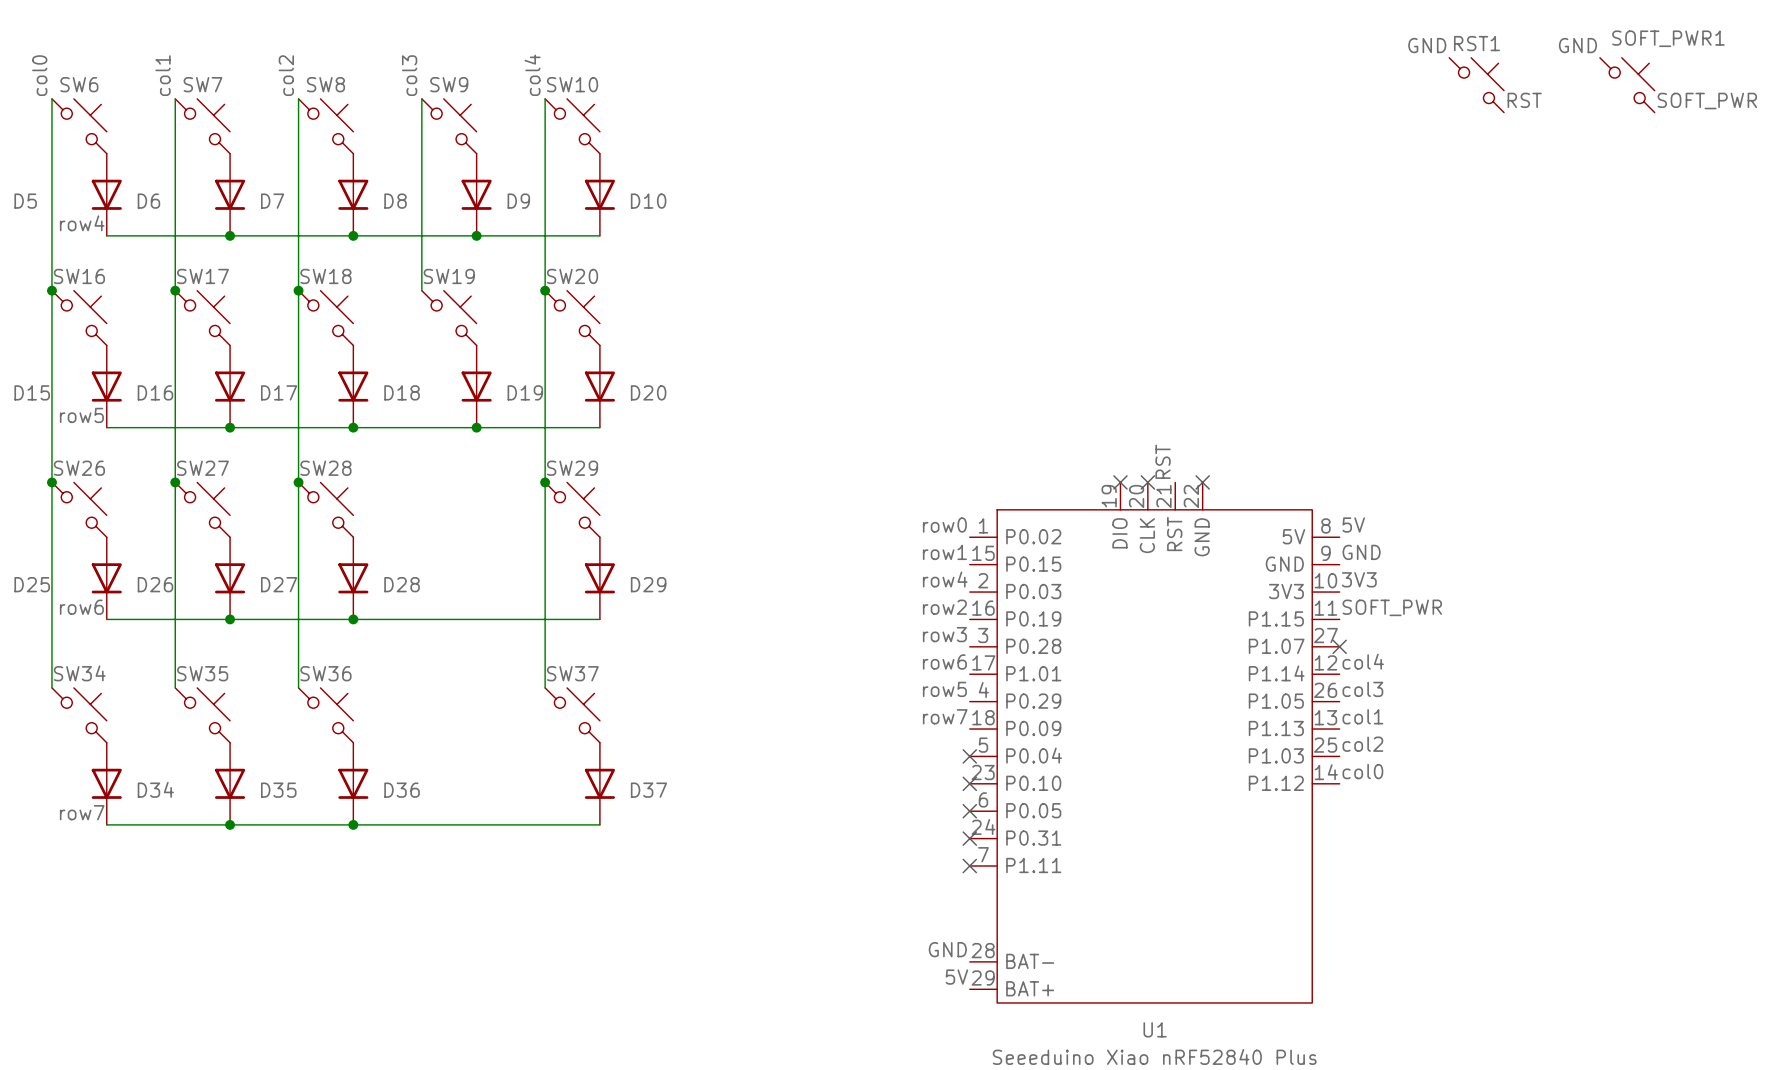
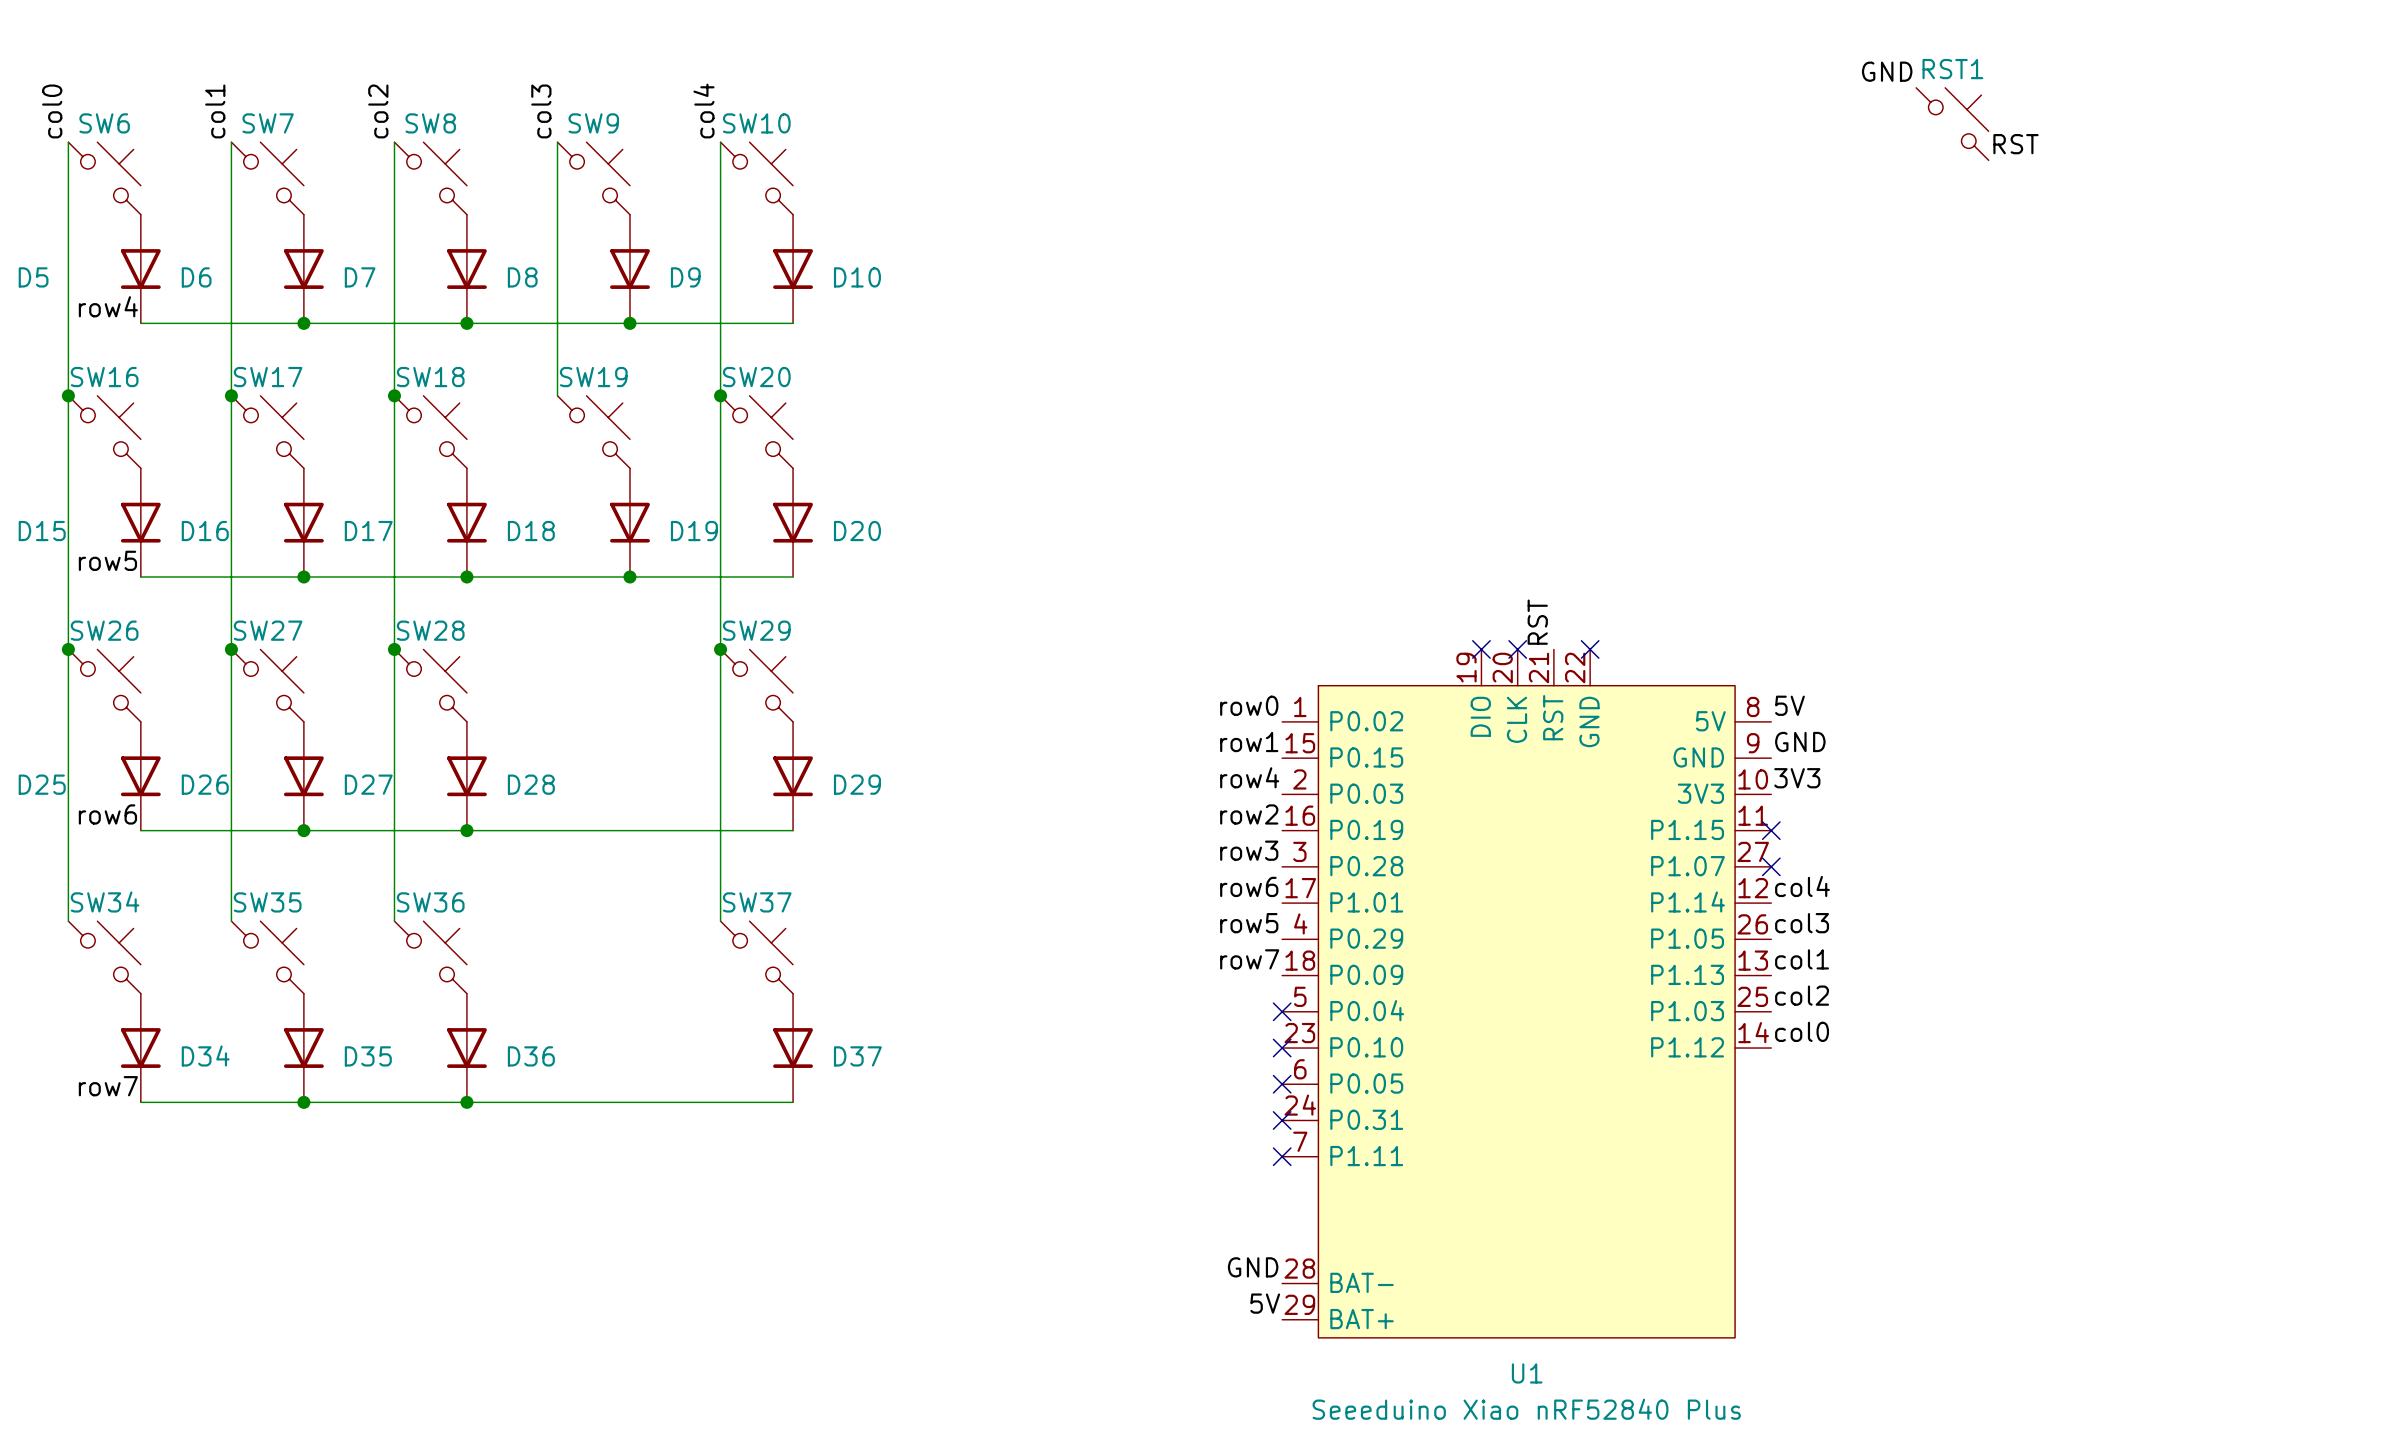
label: GND (1577, 45) -> none
SOFT_PWR1: (1627, 85) -> none
label: SOFT_PWR (1707, 101) -> none
label: SOFT_PWR (1392, 607) -> none
no-connect mark: none -> (1771, 830)

